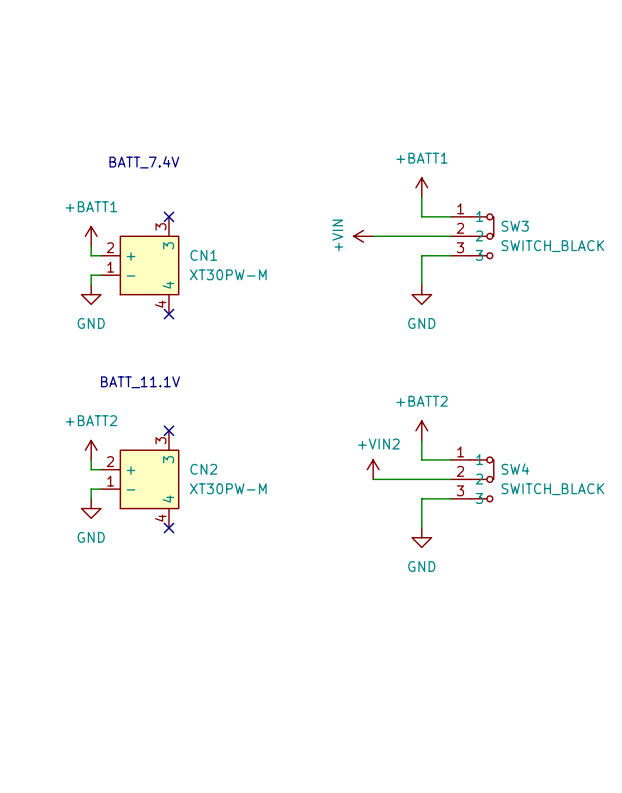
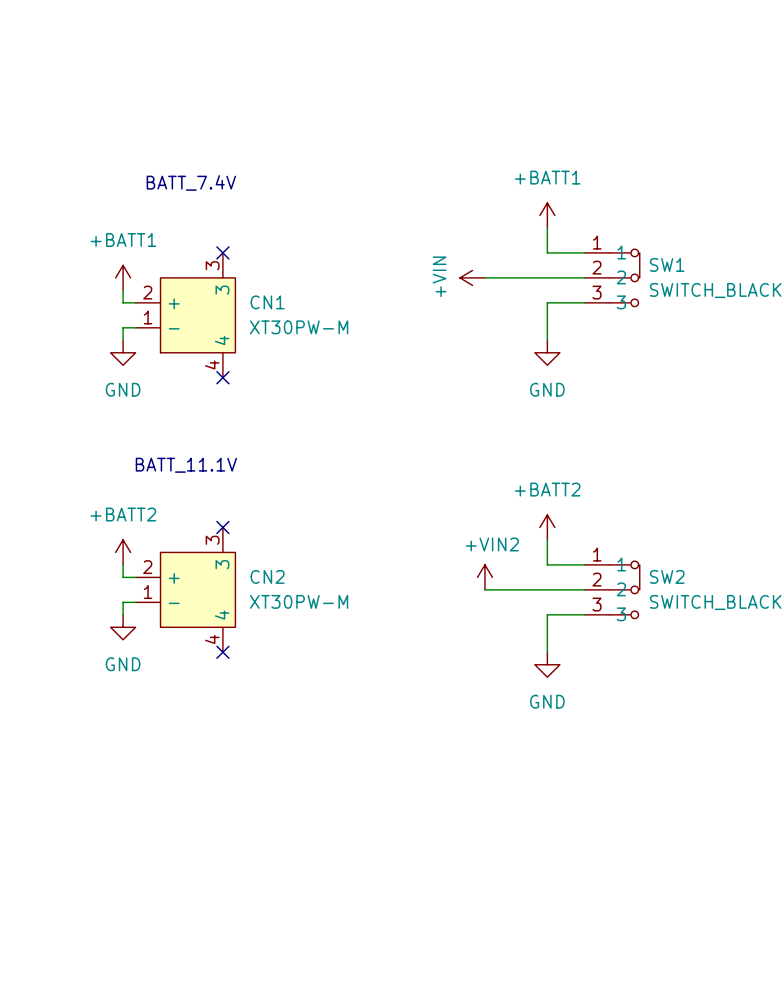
SW3 name: SW3 (515, 226) -> SW1 (667, 264)
SW4 name: SW4 (515, 469) -> SW2 (667, 576)

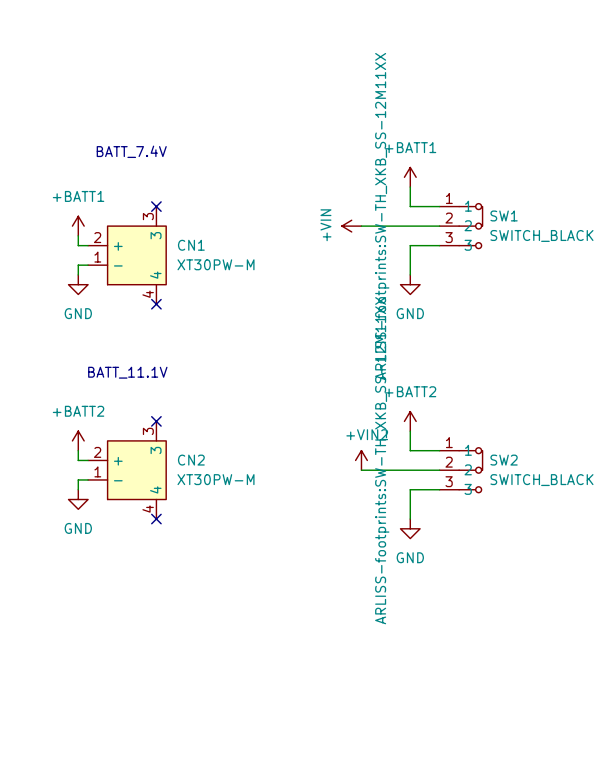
SW1 text: none -> ARLISS-footprints:SW-TH_XKB_SS-12M11XX (382, 216)
SW2 text: none -> ARLISS-footprints:SW-TH_XKB_SS-12M11XX (382, 460)

